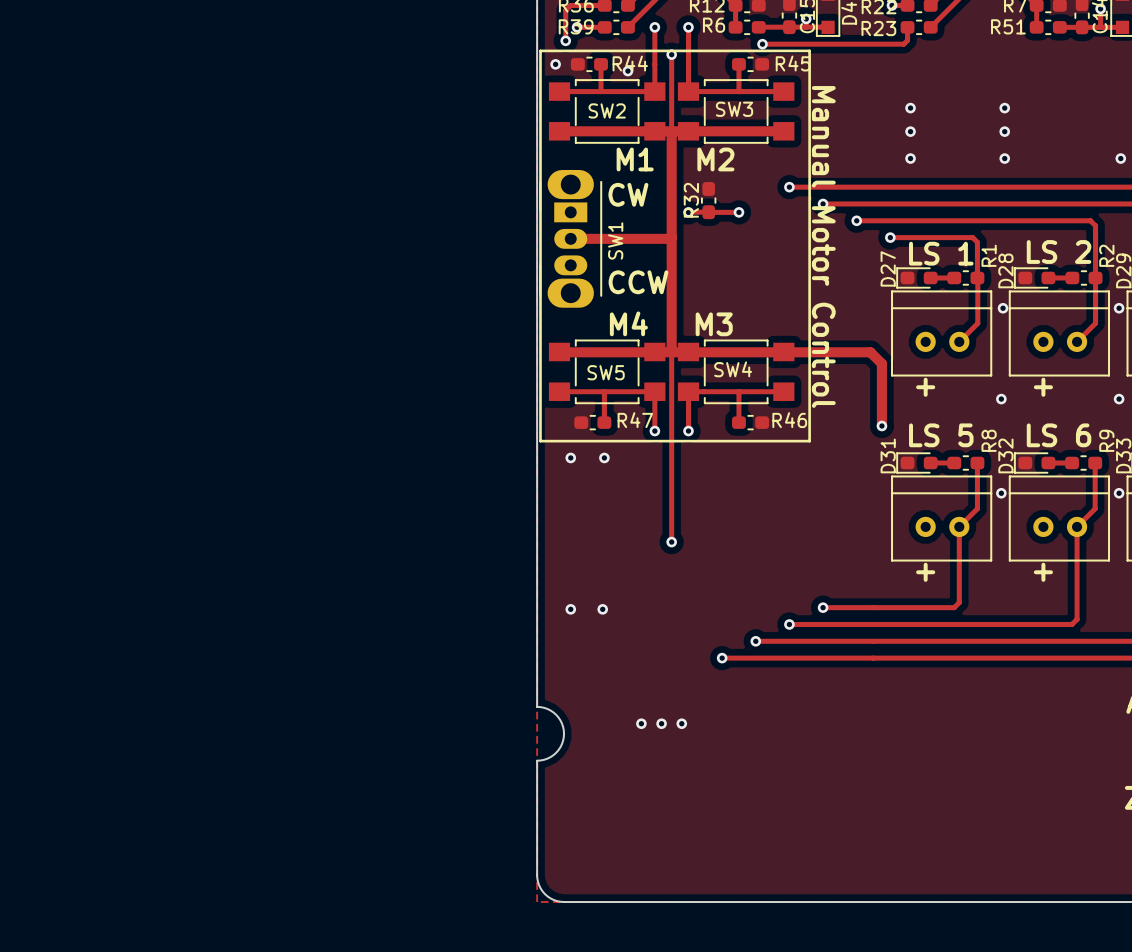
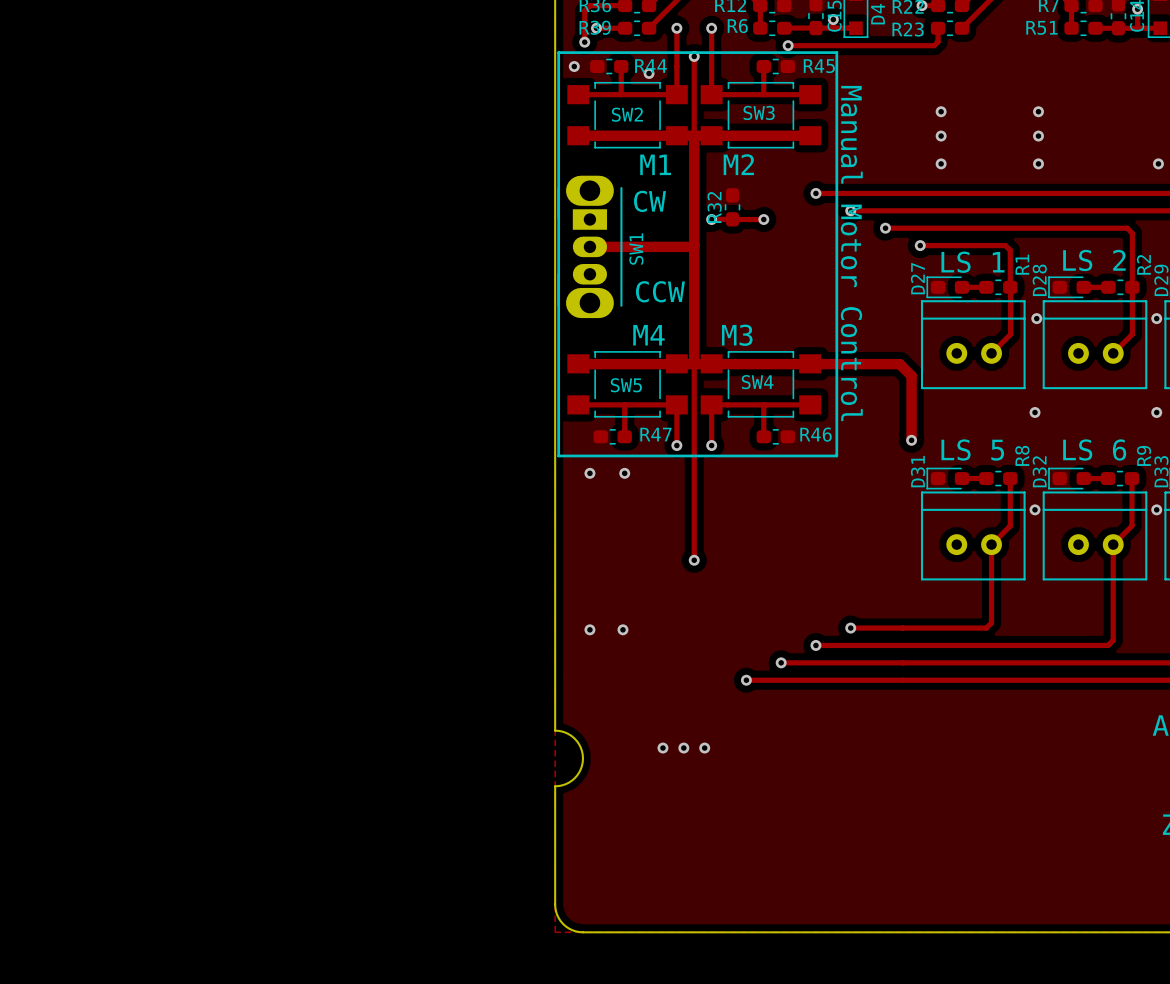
text: + (925, 387) -> none
text: + (1043, 387) -> none
text: + (925, 572) -> none
text: + (1043, 572) -> none

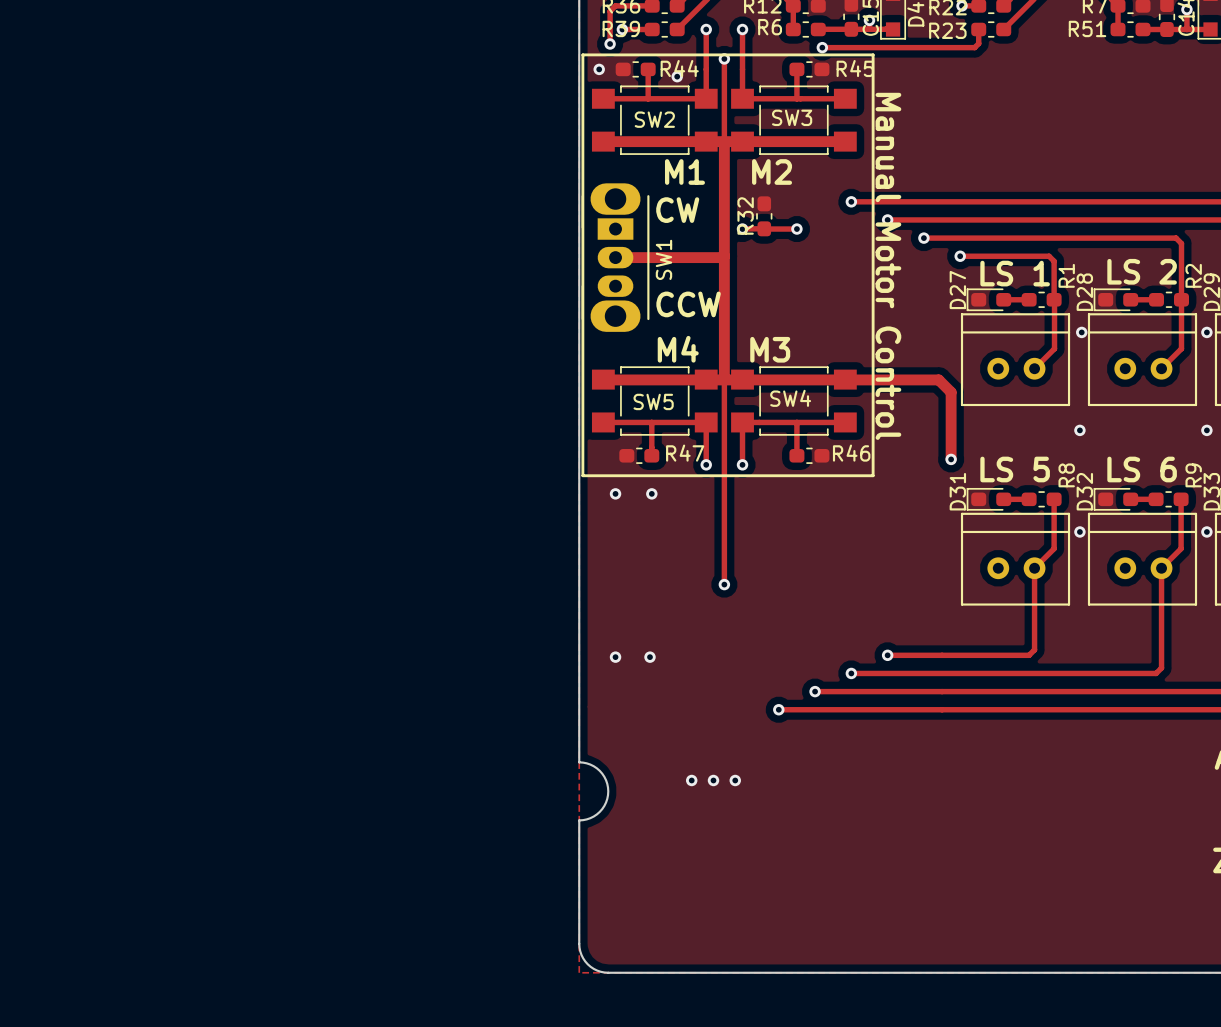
via: (941, 111) -> none
via: (1038, 111) -> none
via: (941, 136) -> none
via: (1038, 136) -> none
via: (941, 163) -> none
via: (1038, 163) -> none
via: (1158, 163) -> none

